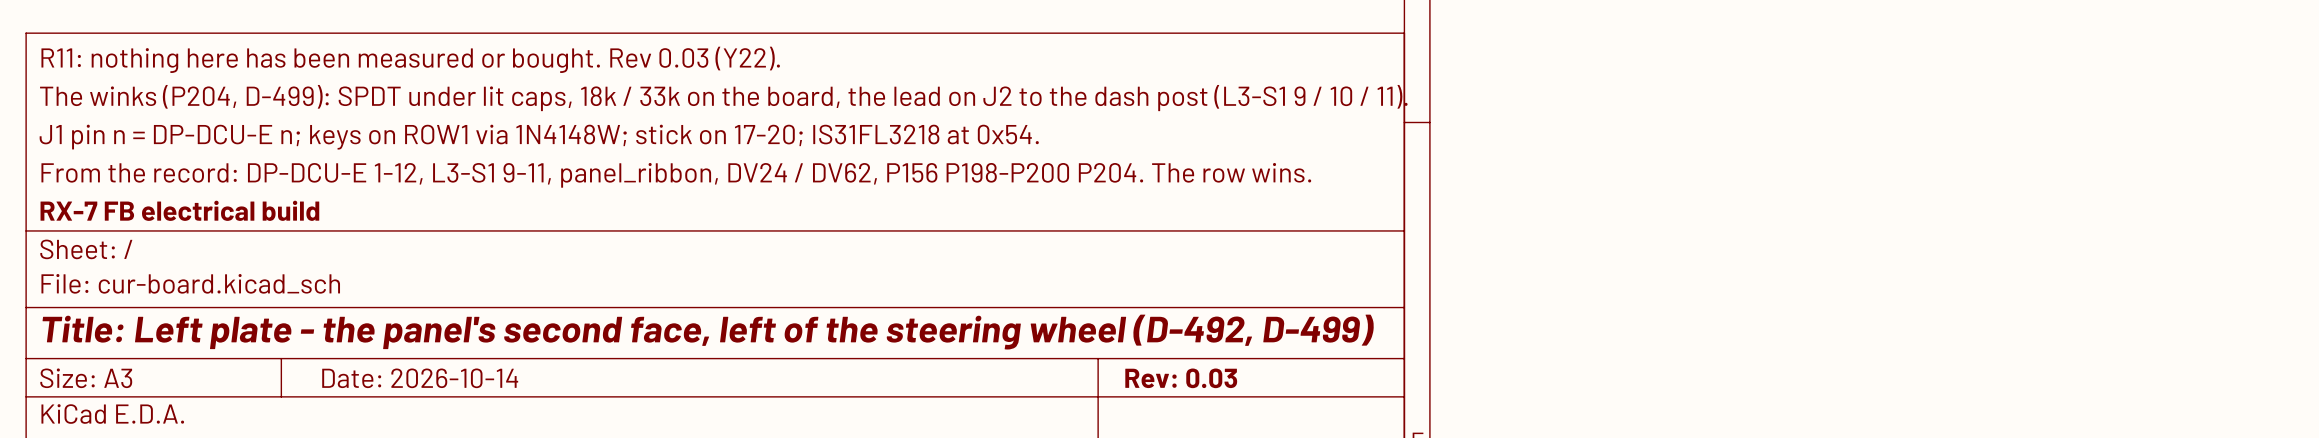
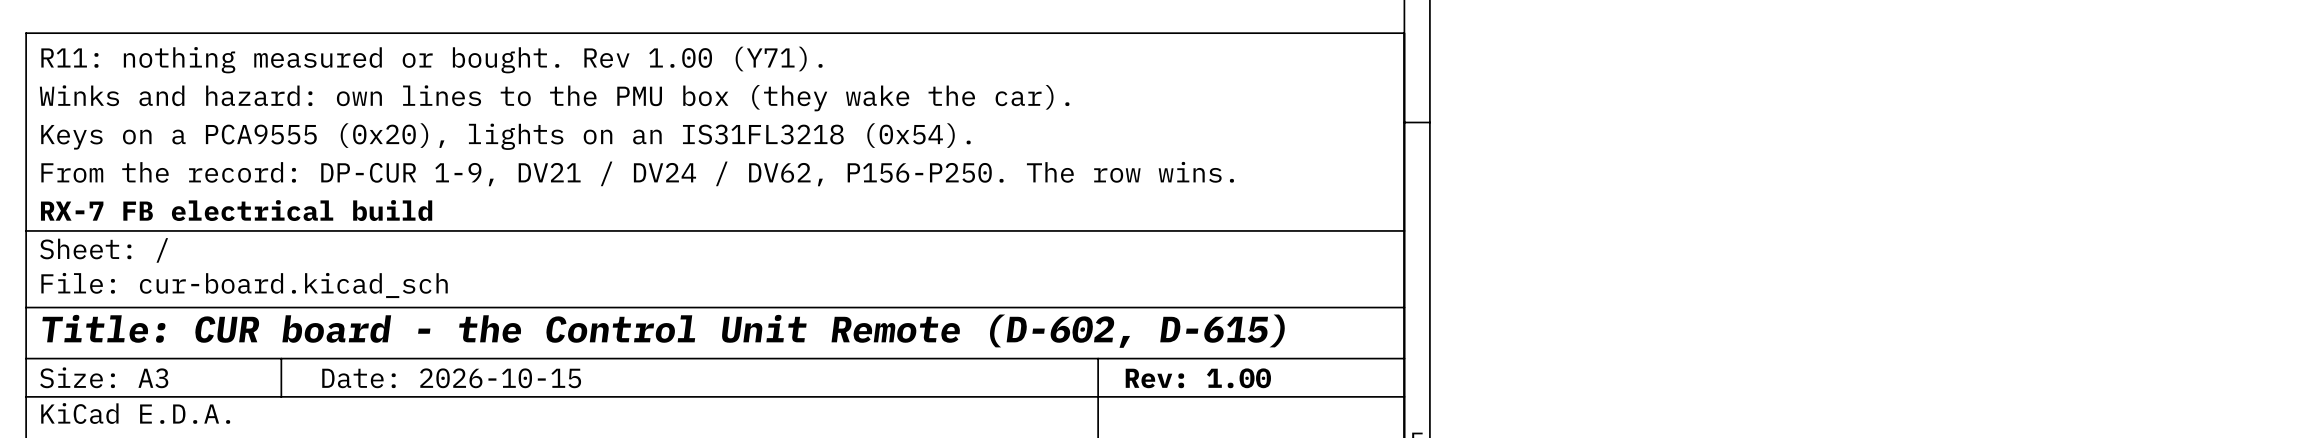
title block: R11: nothing here has been measured or bought. Rev 0.03 (Y22). (410, 59) -> R11: nothing measured or bought. Rev 1.00 (Y71). (431, 60)
title block: The winks (P204, D-499): SPDT under lit caps, 18k / 33k on the board, the lead on J2 to the dash post (L3-S1 9 / 10 / 11). (723, 98) -> Winks and hazard: own lines to the PMU box (they wake the car). (554, 98)
title block: J1 pin n = DP-DCU-E n; keys on ROW1 via 1N4148W; stick on 17-20; IS31FL3218 at 0x54. (539, 137) -> Keys on a PCA9555 (0x20), lights on an IS31FL3218 (0x54). (505, 136)
title block: From the record: DP-DCU-E 1-12, L3-S1 9-11, panel_ribbon, DV24 / DV62, P156 P198-P200 P204. The row wins. (676, 175) -> From the record: DP-CUR 1-9, DV21 / DV24 / DV62, P156-P250. The row wins. (637, 173)
title block: Title: Left plate - the panel's second face, left of the steering wheel (D-492, D-499) (708, 332) -> Title: CUR board - the Control Unit Remote (D-602, D-615) (663, 331)
title block: Date: 2026-10-14 (420, 378) -> Date: 2026-10-15 (451, 378)
title block: Rev: 0.03 (1181, 378) -> Rev: 1.00 (1198, 378)

